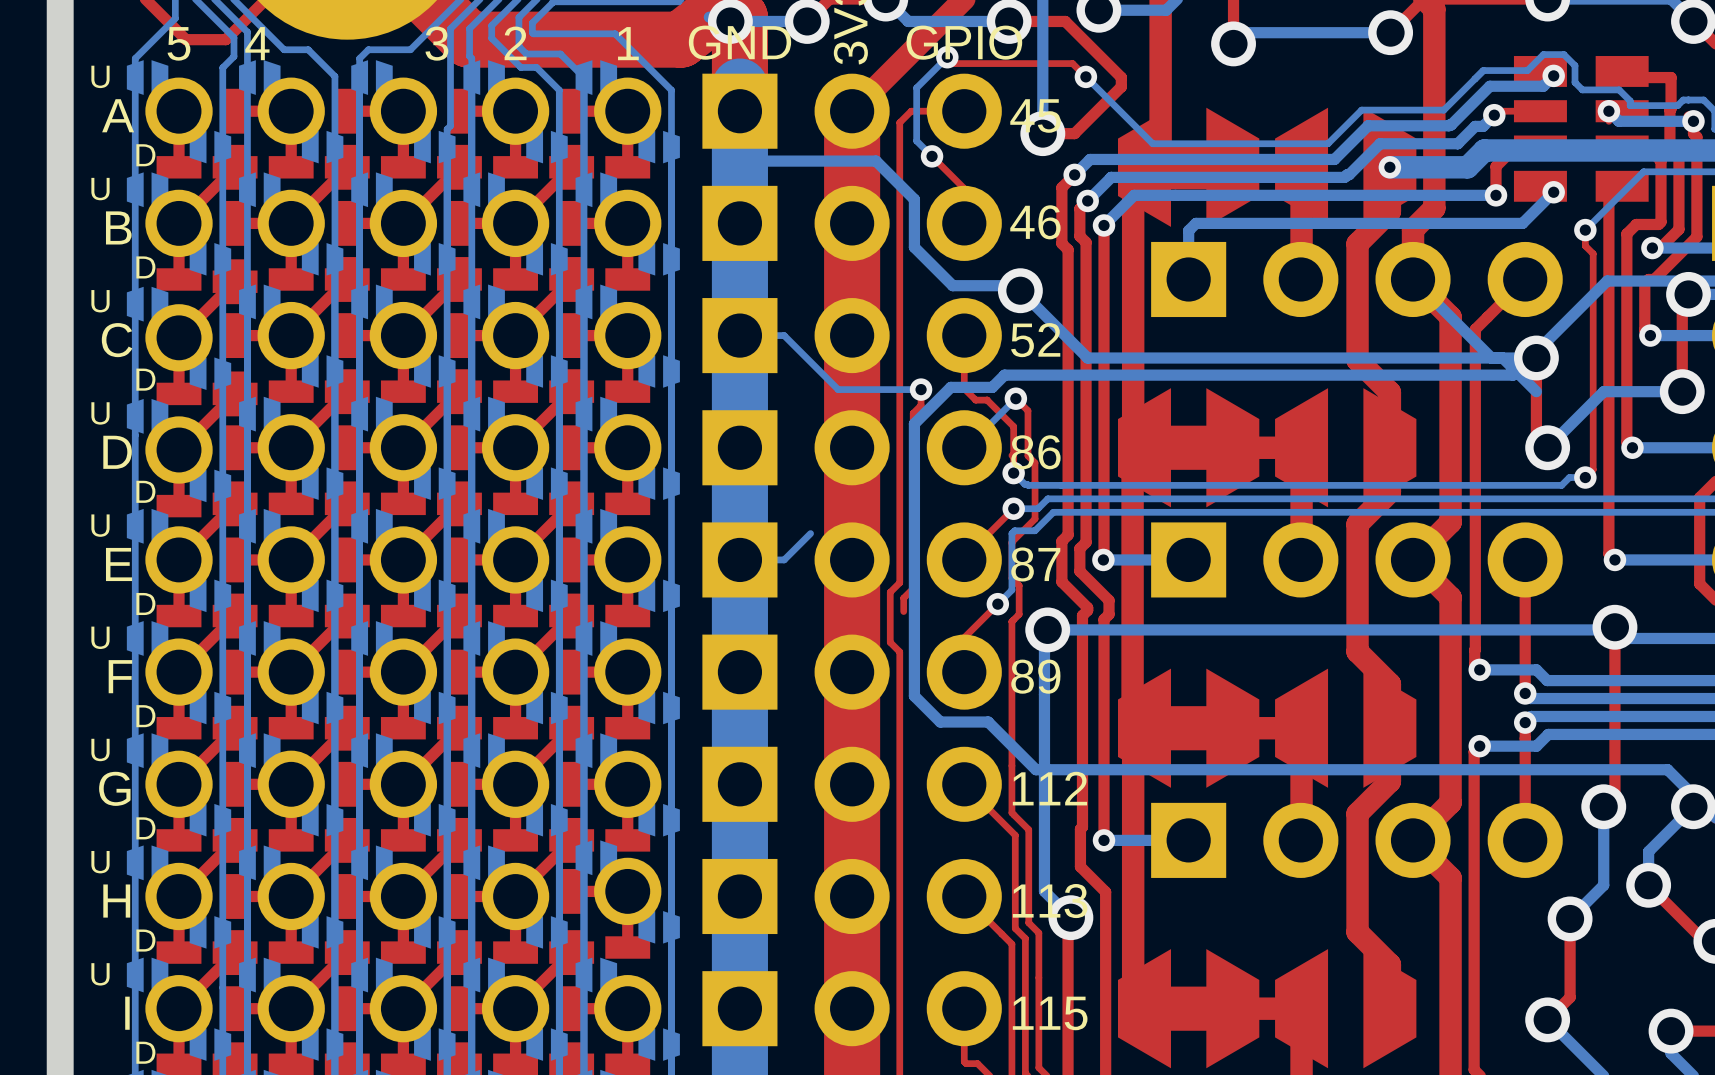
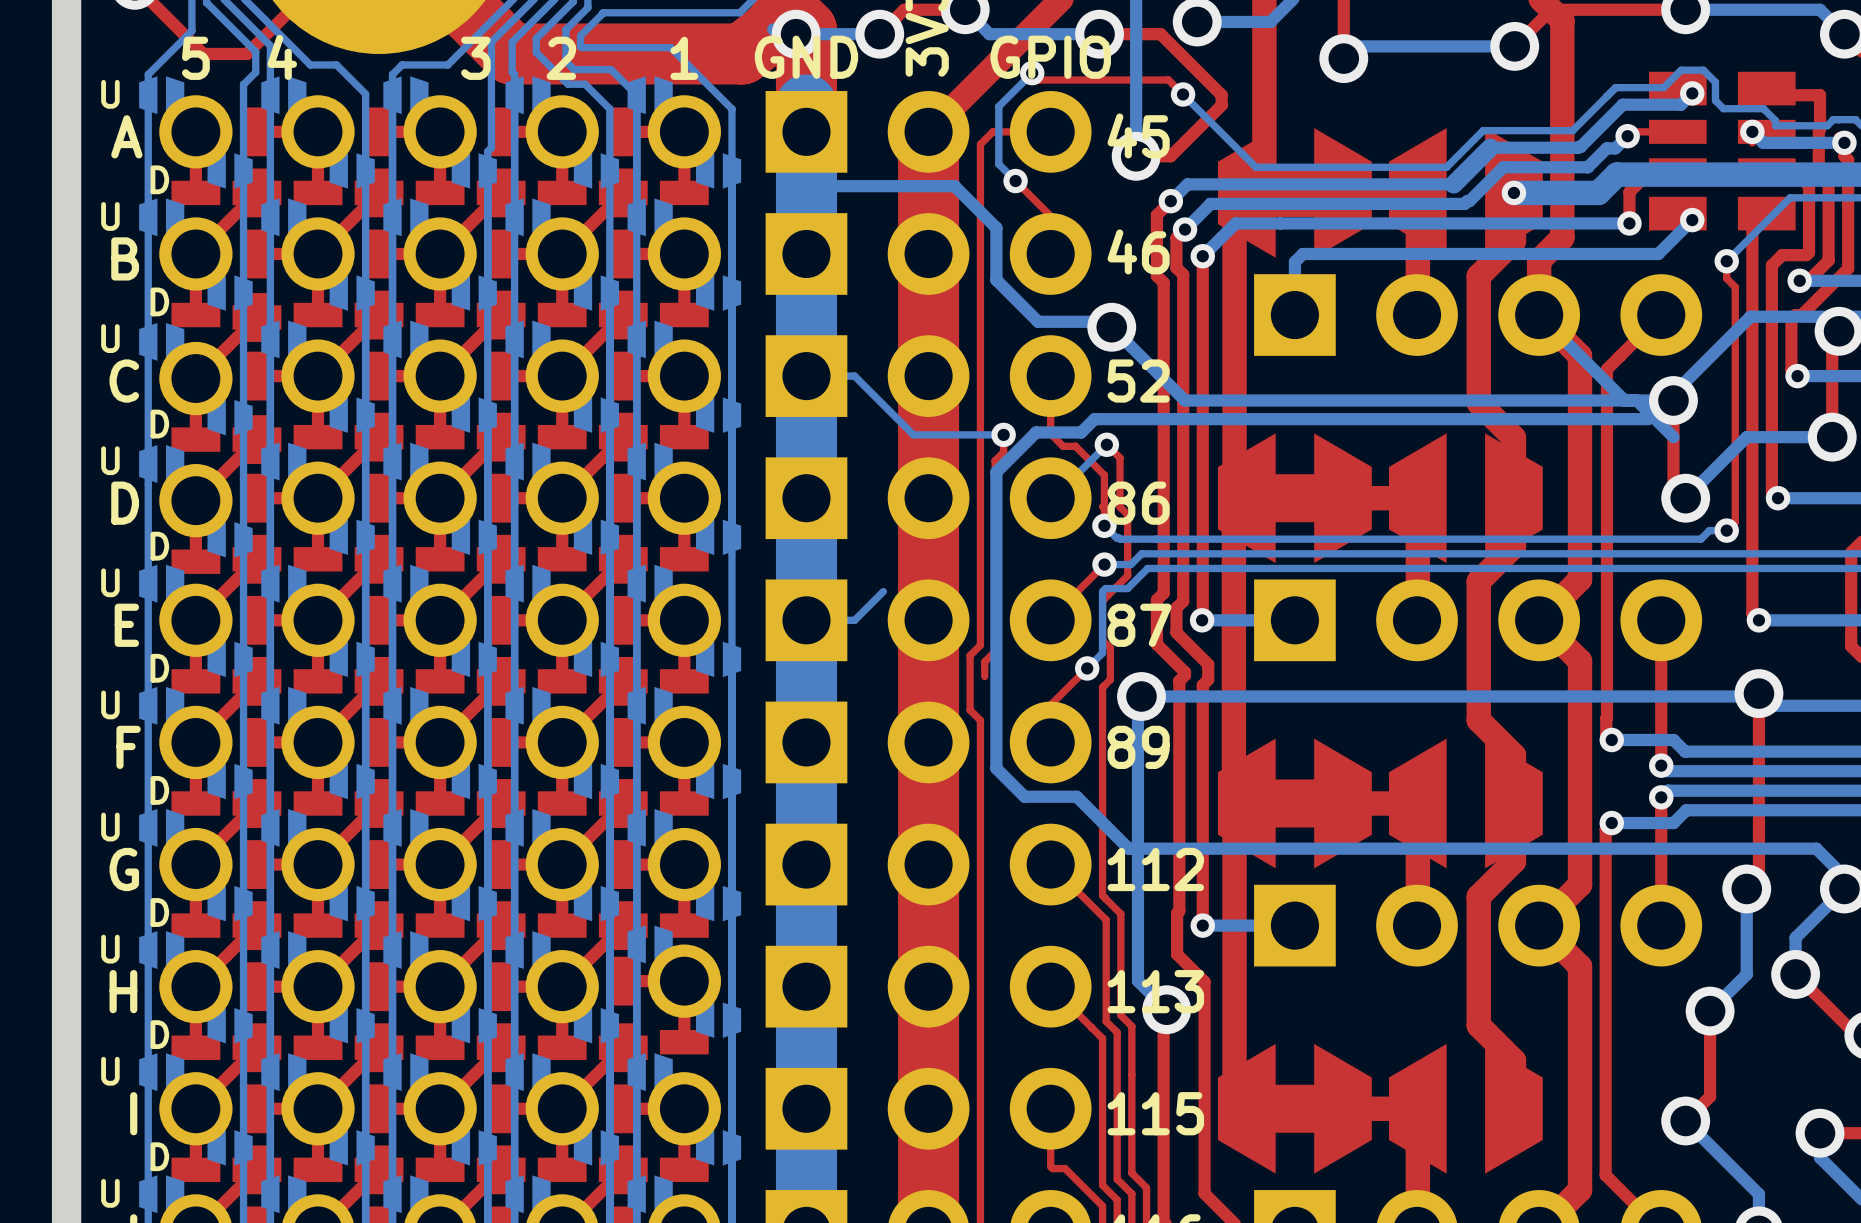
bottom track width: thin (1368, 125) (1334, 159) -> thick (1490, 147) (1453, 184)

